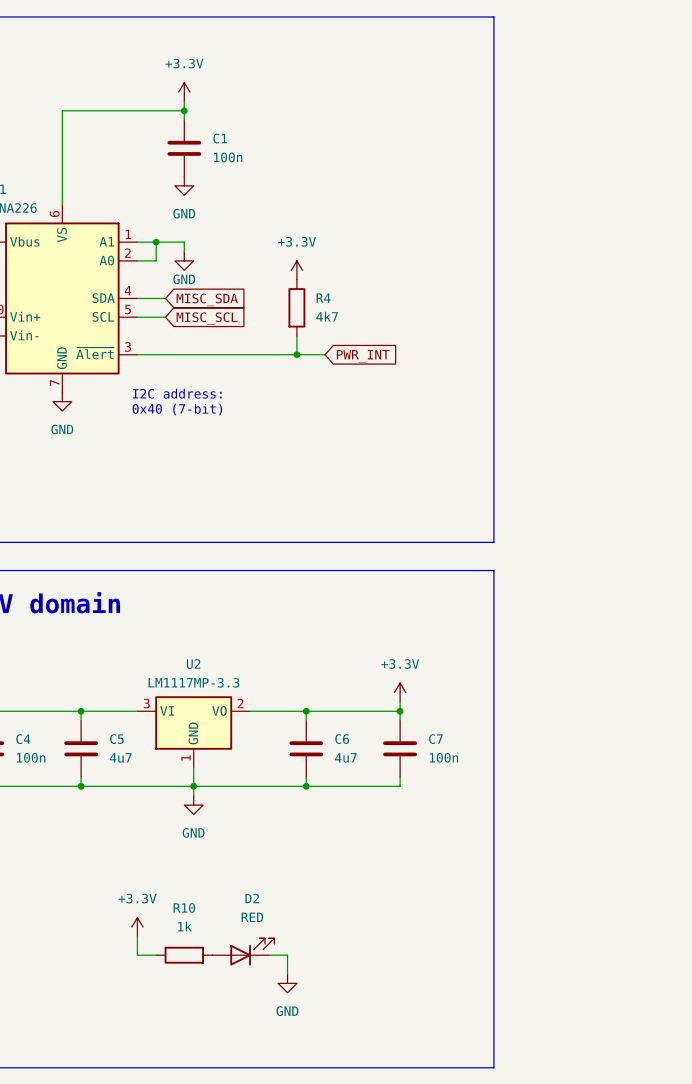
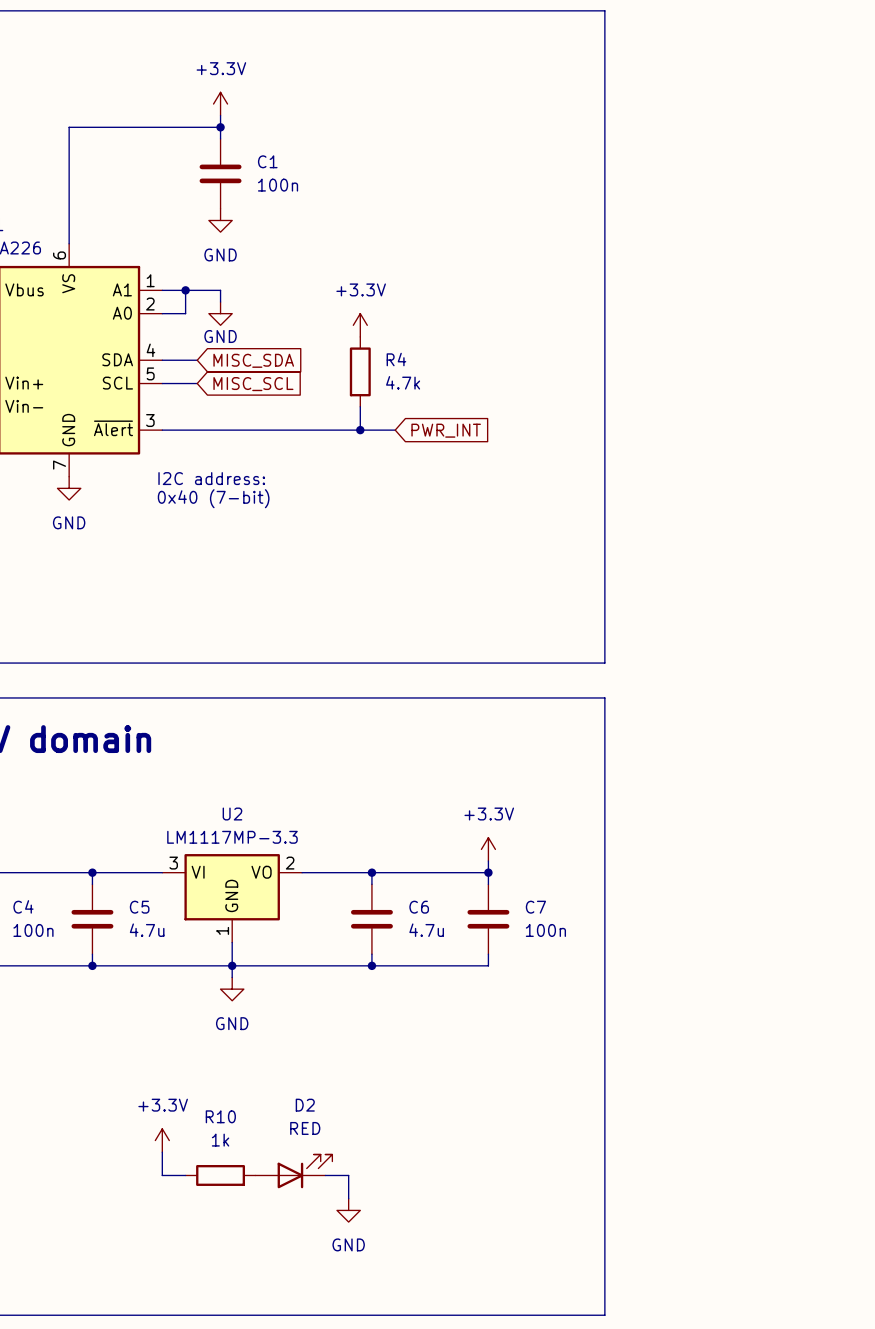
R4 value: 4k7 (327, 316) -> 4.7k (403, 382)
C5 value: 4u7 (120, 757) -> 4.7u (147, 930)
C6 value: 4u7 (345, 757) -> 4.7u (426, 930)

